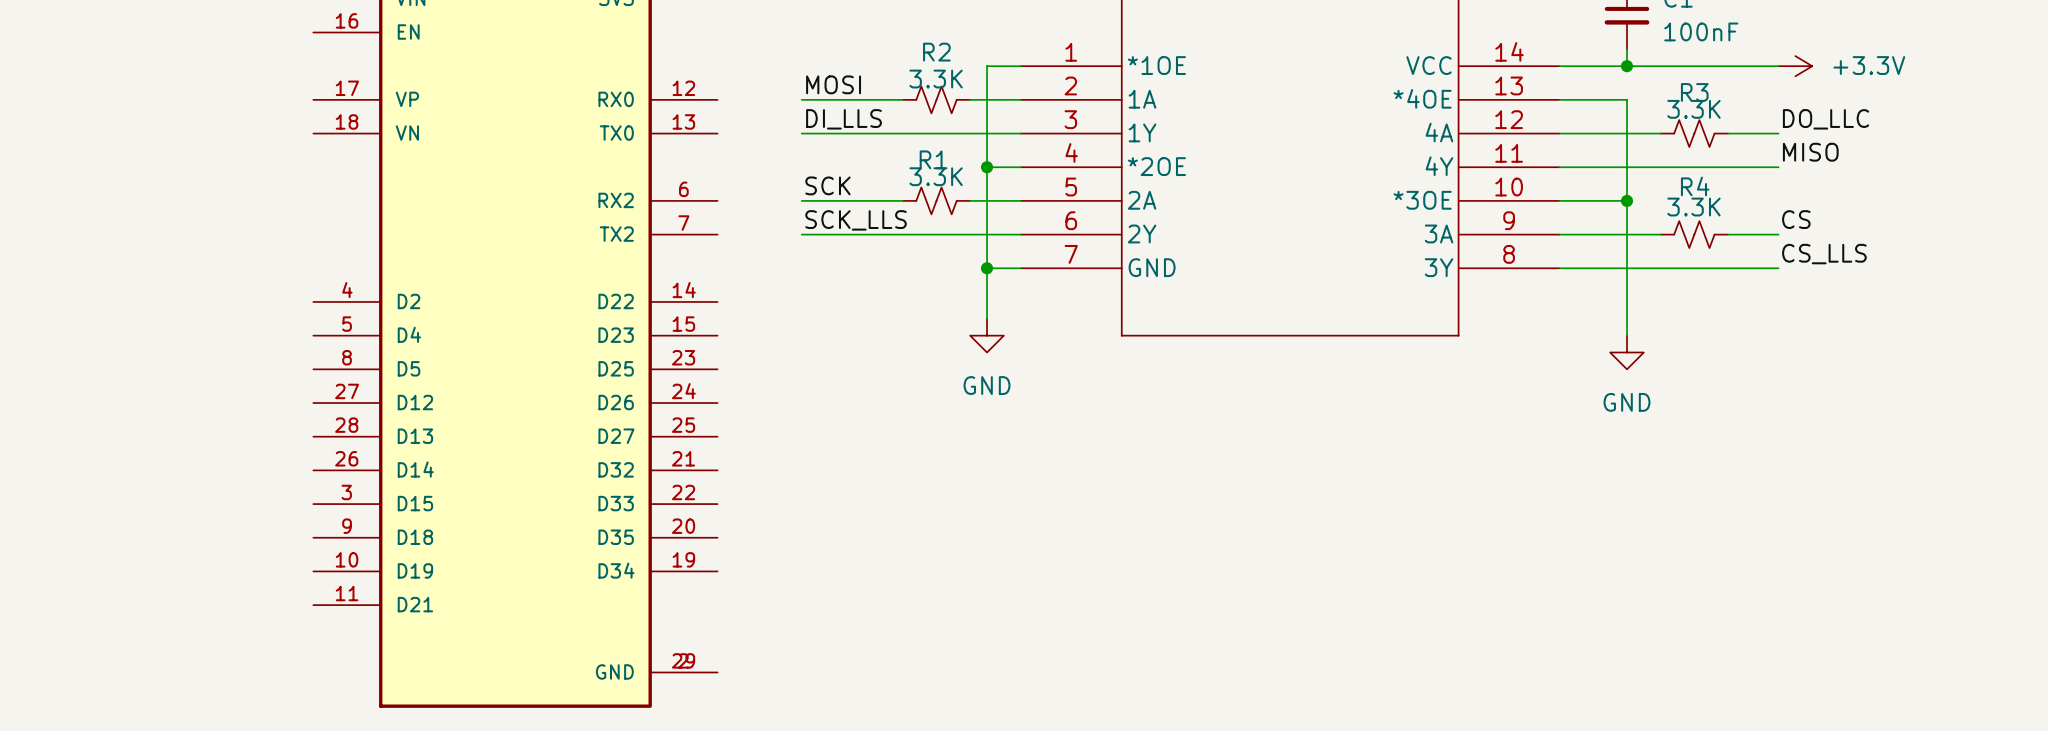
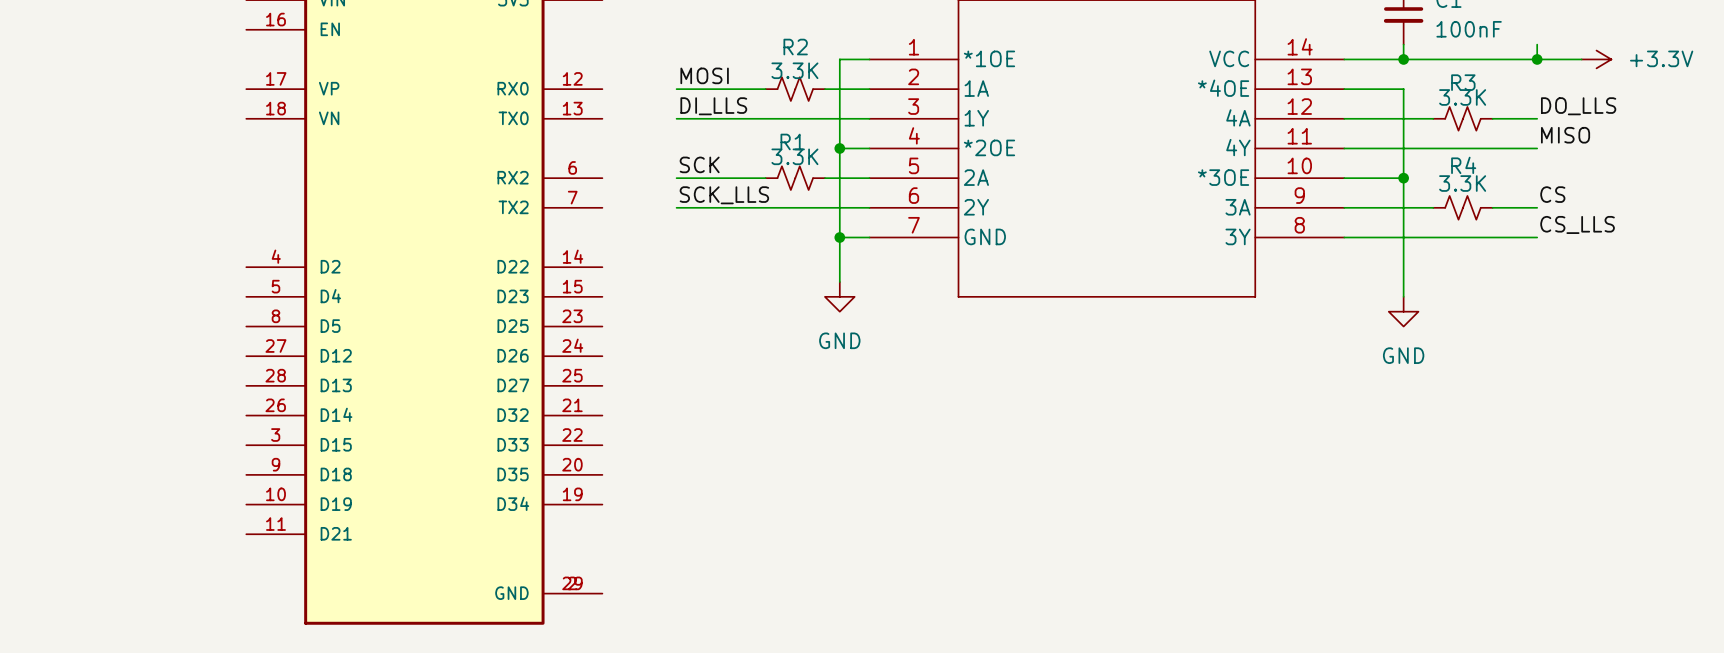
wire: none -> (1537, 44) (1537, 59) (1581, 59)
junction: none -> (1537, 59)
power symbol position: +3.3V (1795, 66) -> +3.3V (1596, 59)
label: DO_LLC (1826, 119) -> DO_LLS (1578, 106)

